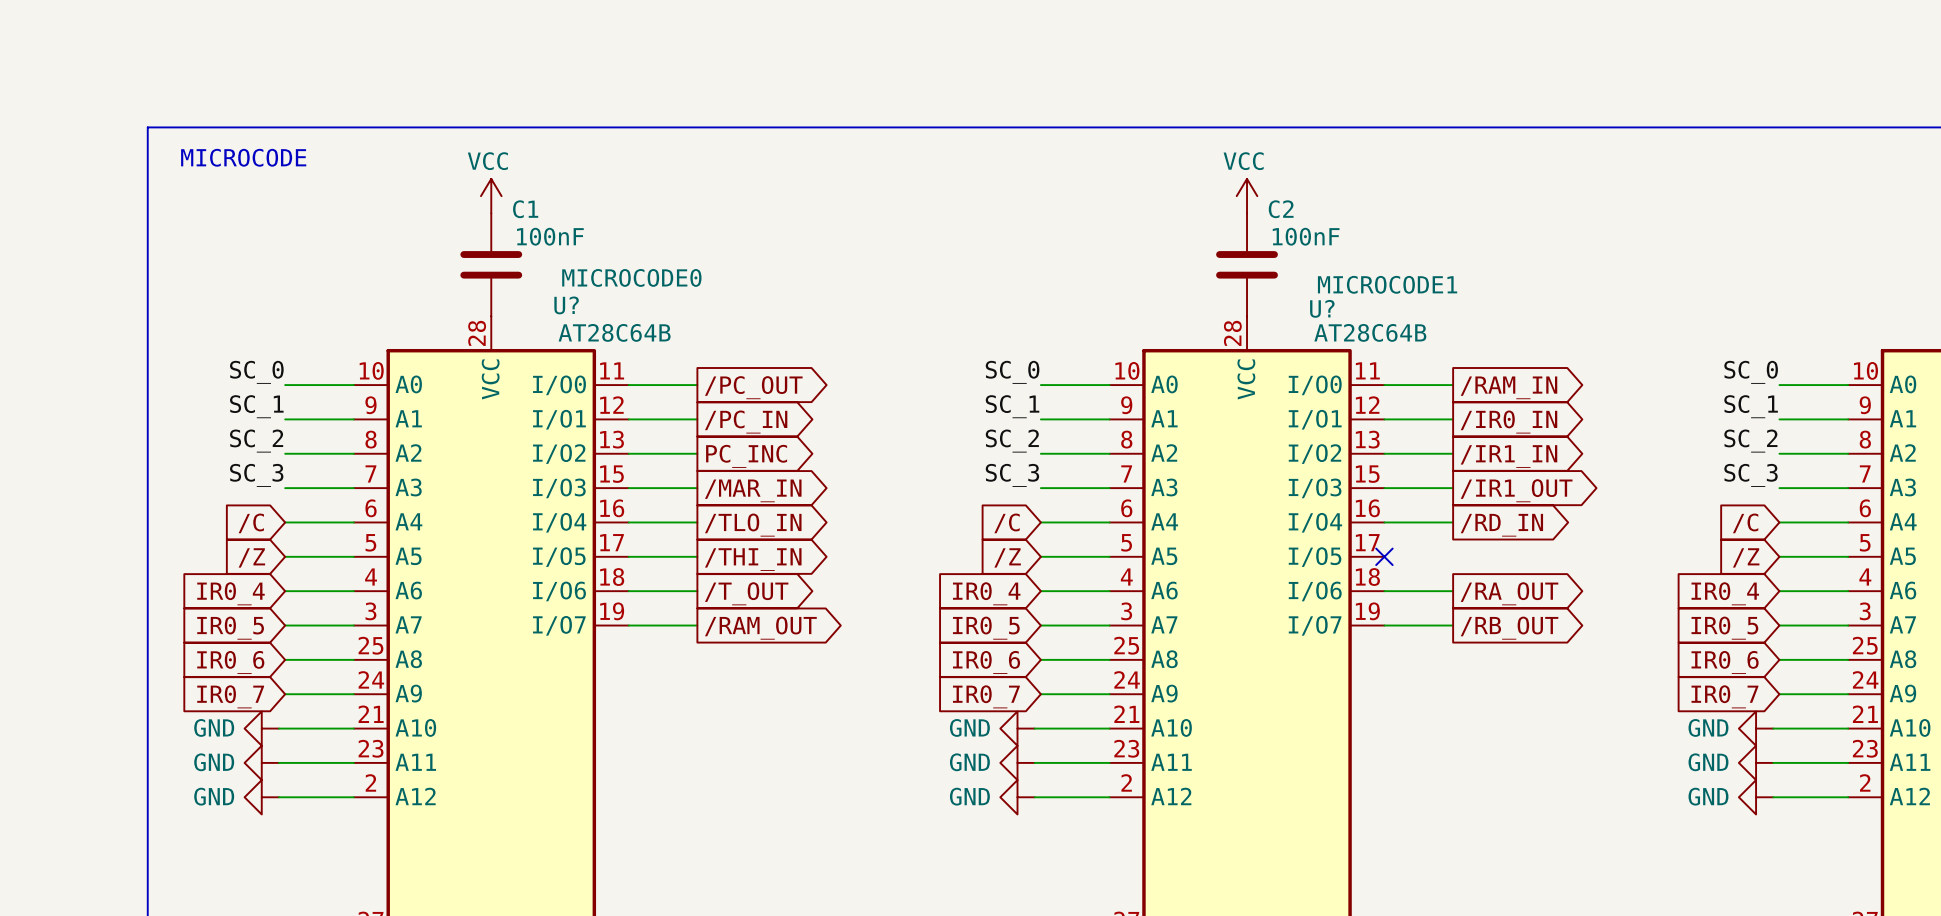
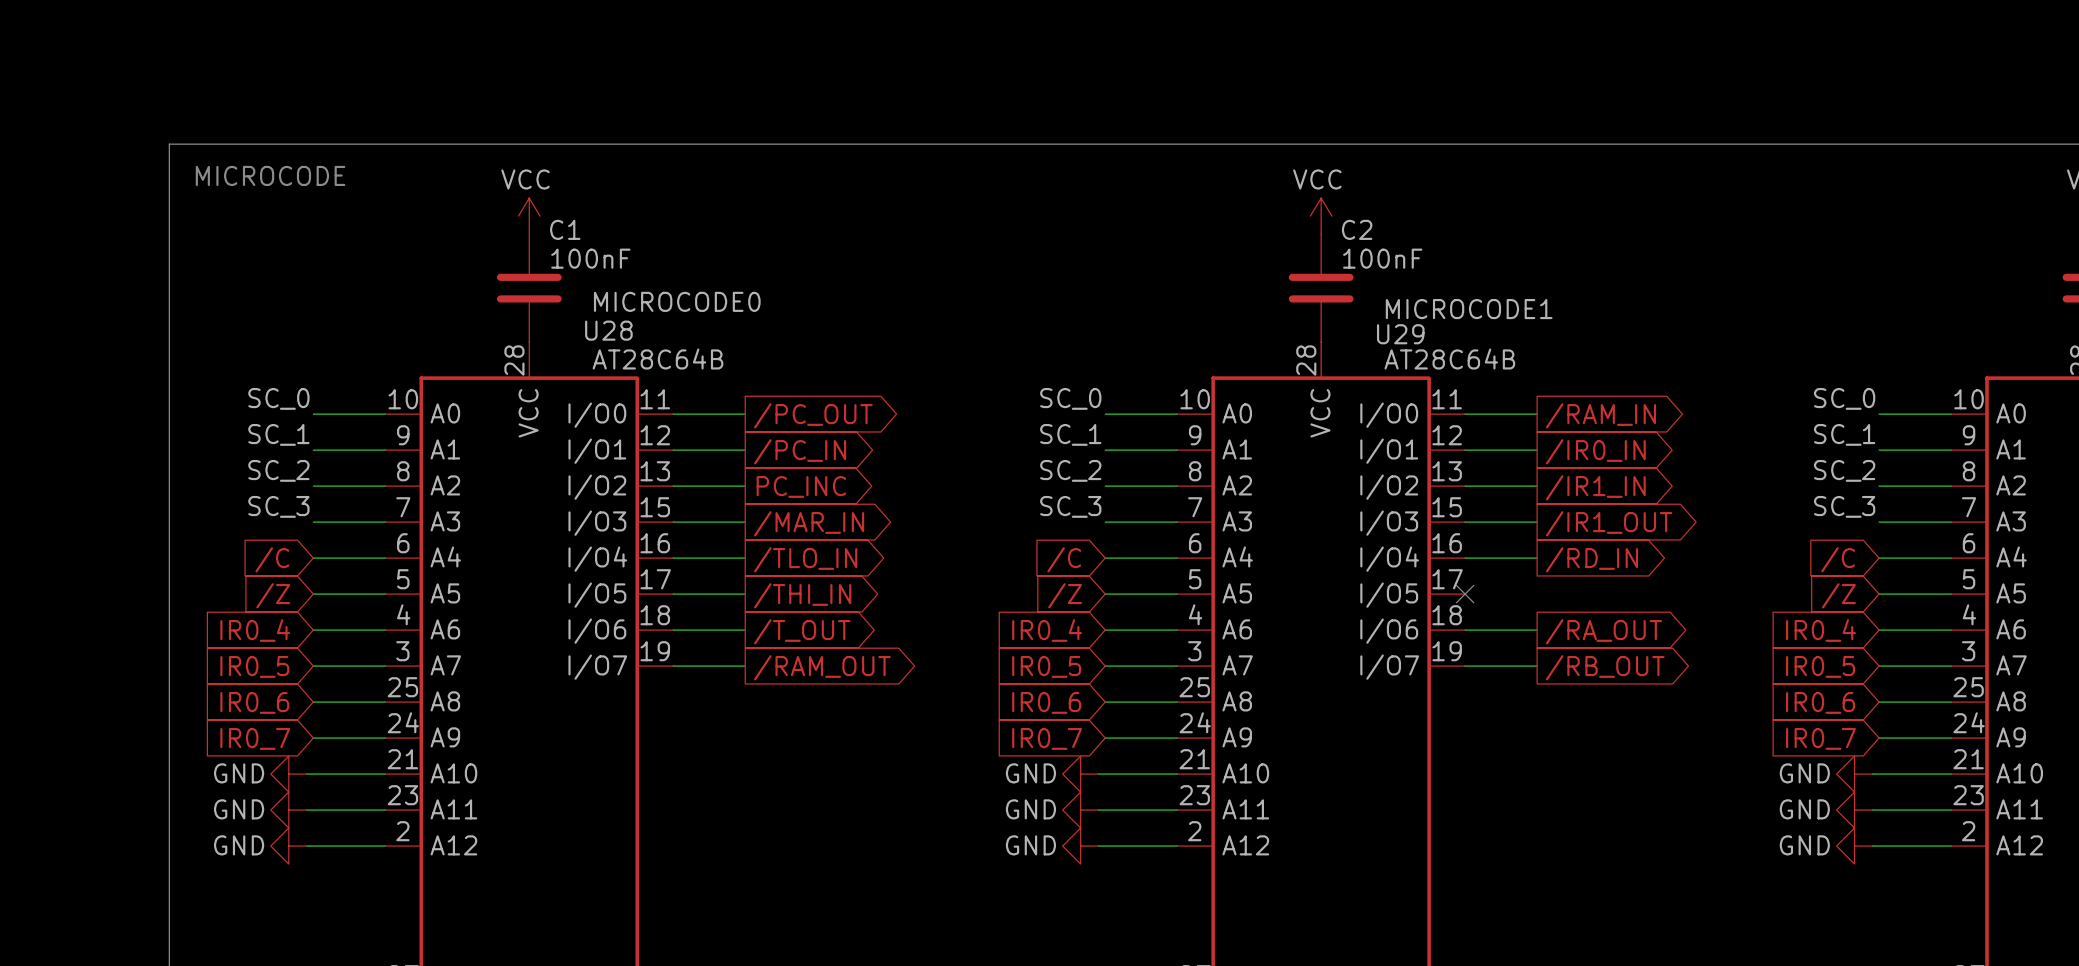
U? name: U? (566, 305) -> U28 (608, 330)
U? name: U? (1322, 308) -> U29 (1400, 334)

